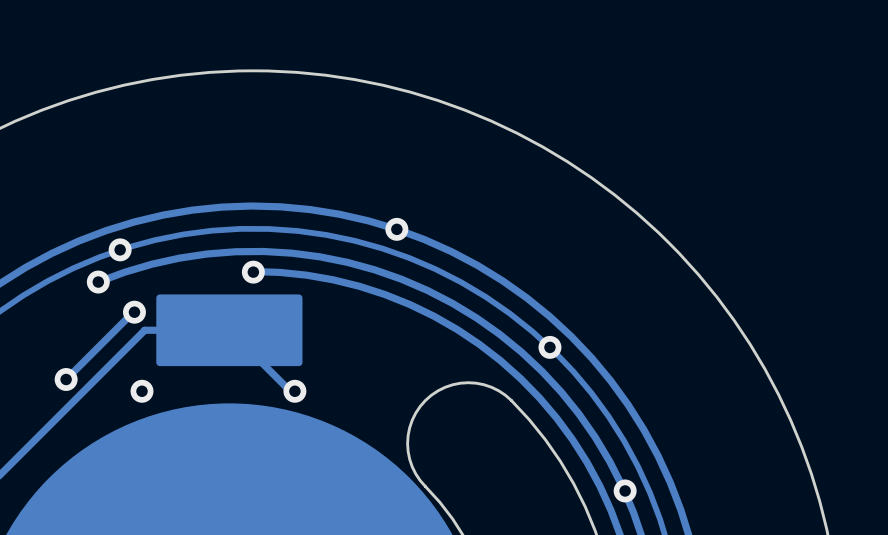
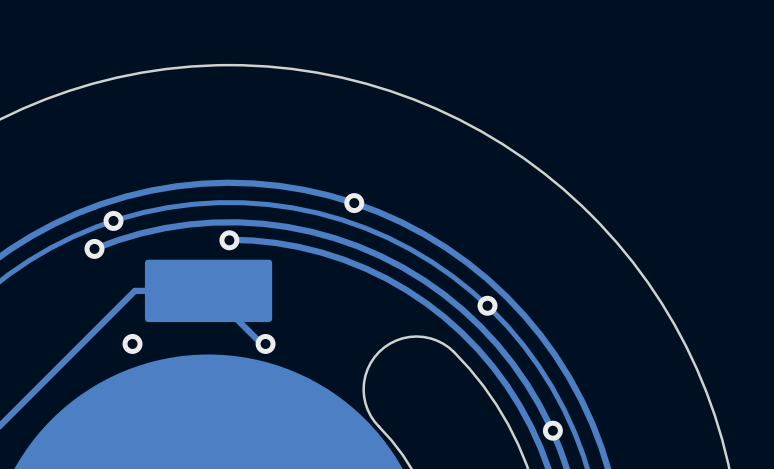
track: (134, 312) (66, 379) -> none
via: (134, 312) -> none
via: (66, 379) -> none

